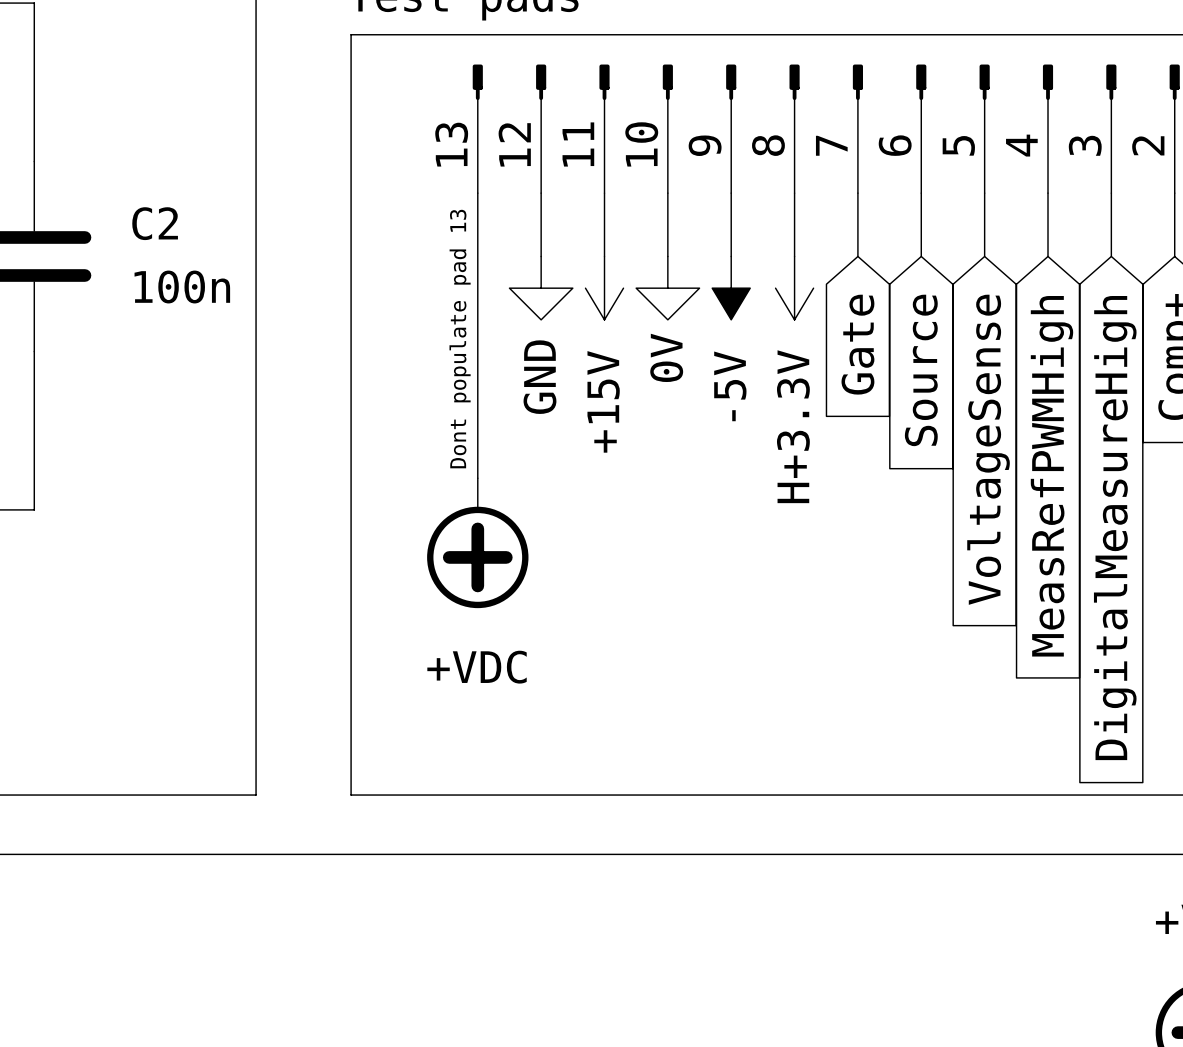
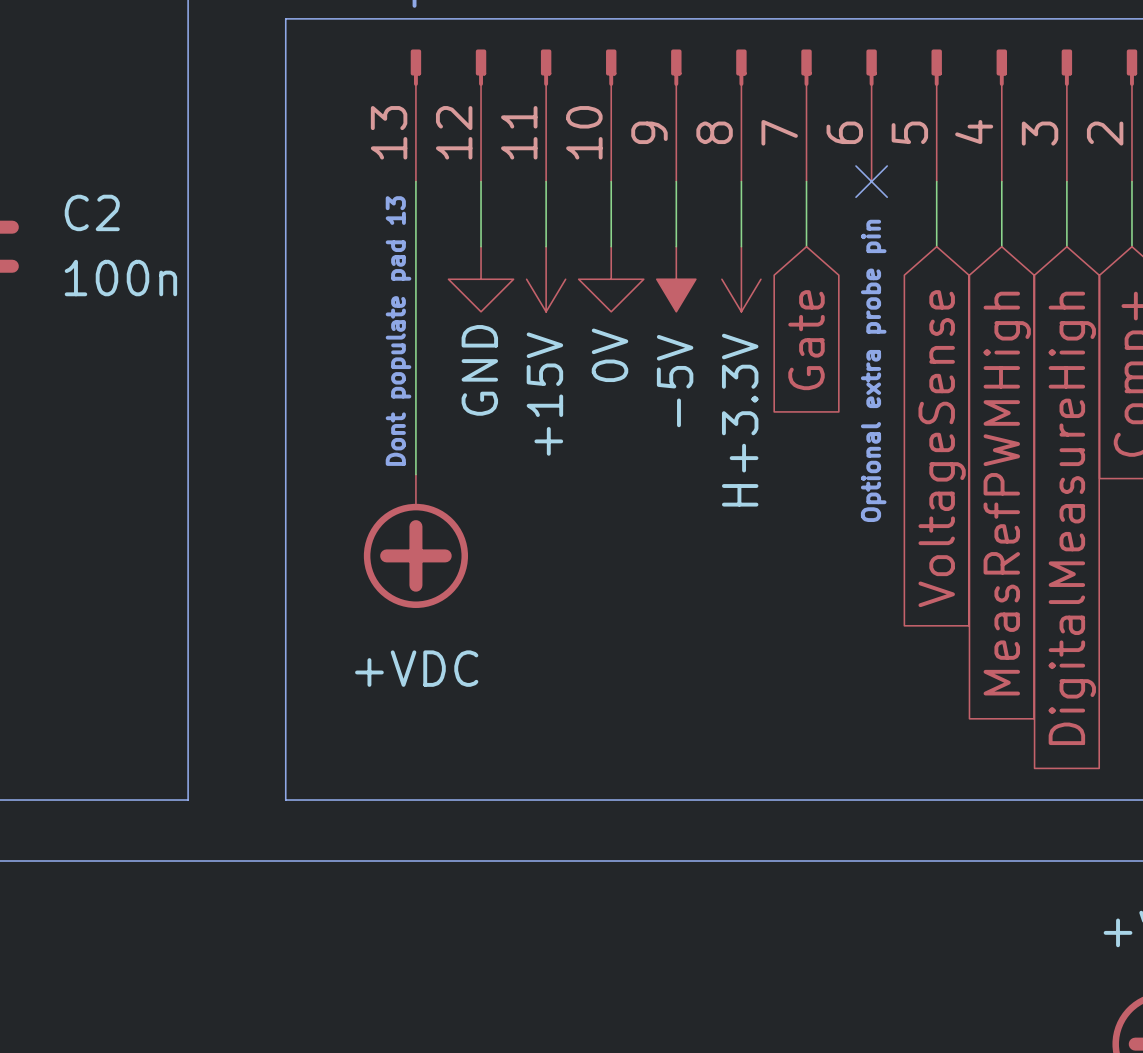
wire: (921, 193) (921, 256) -> none
no-connect mark: none -> (871, 181)
global label: Source (921, 370) -> none
text: none -> Optional extra probe pin (873, 370)

